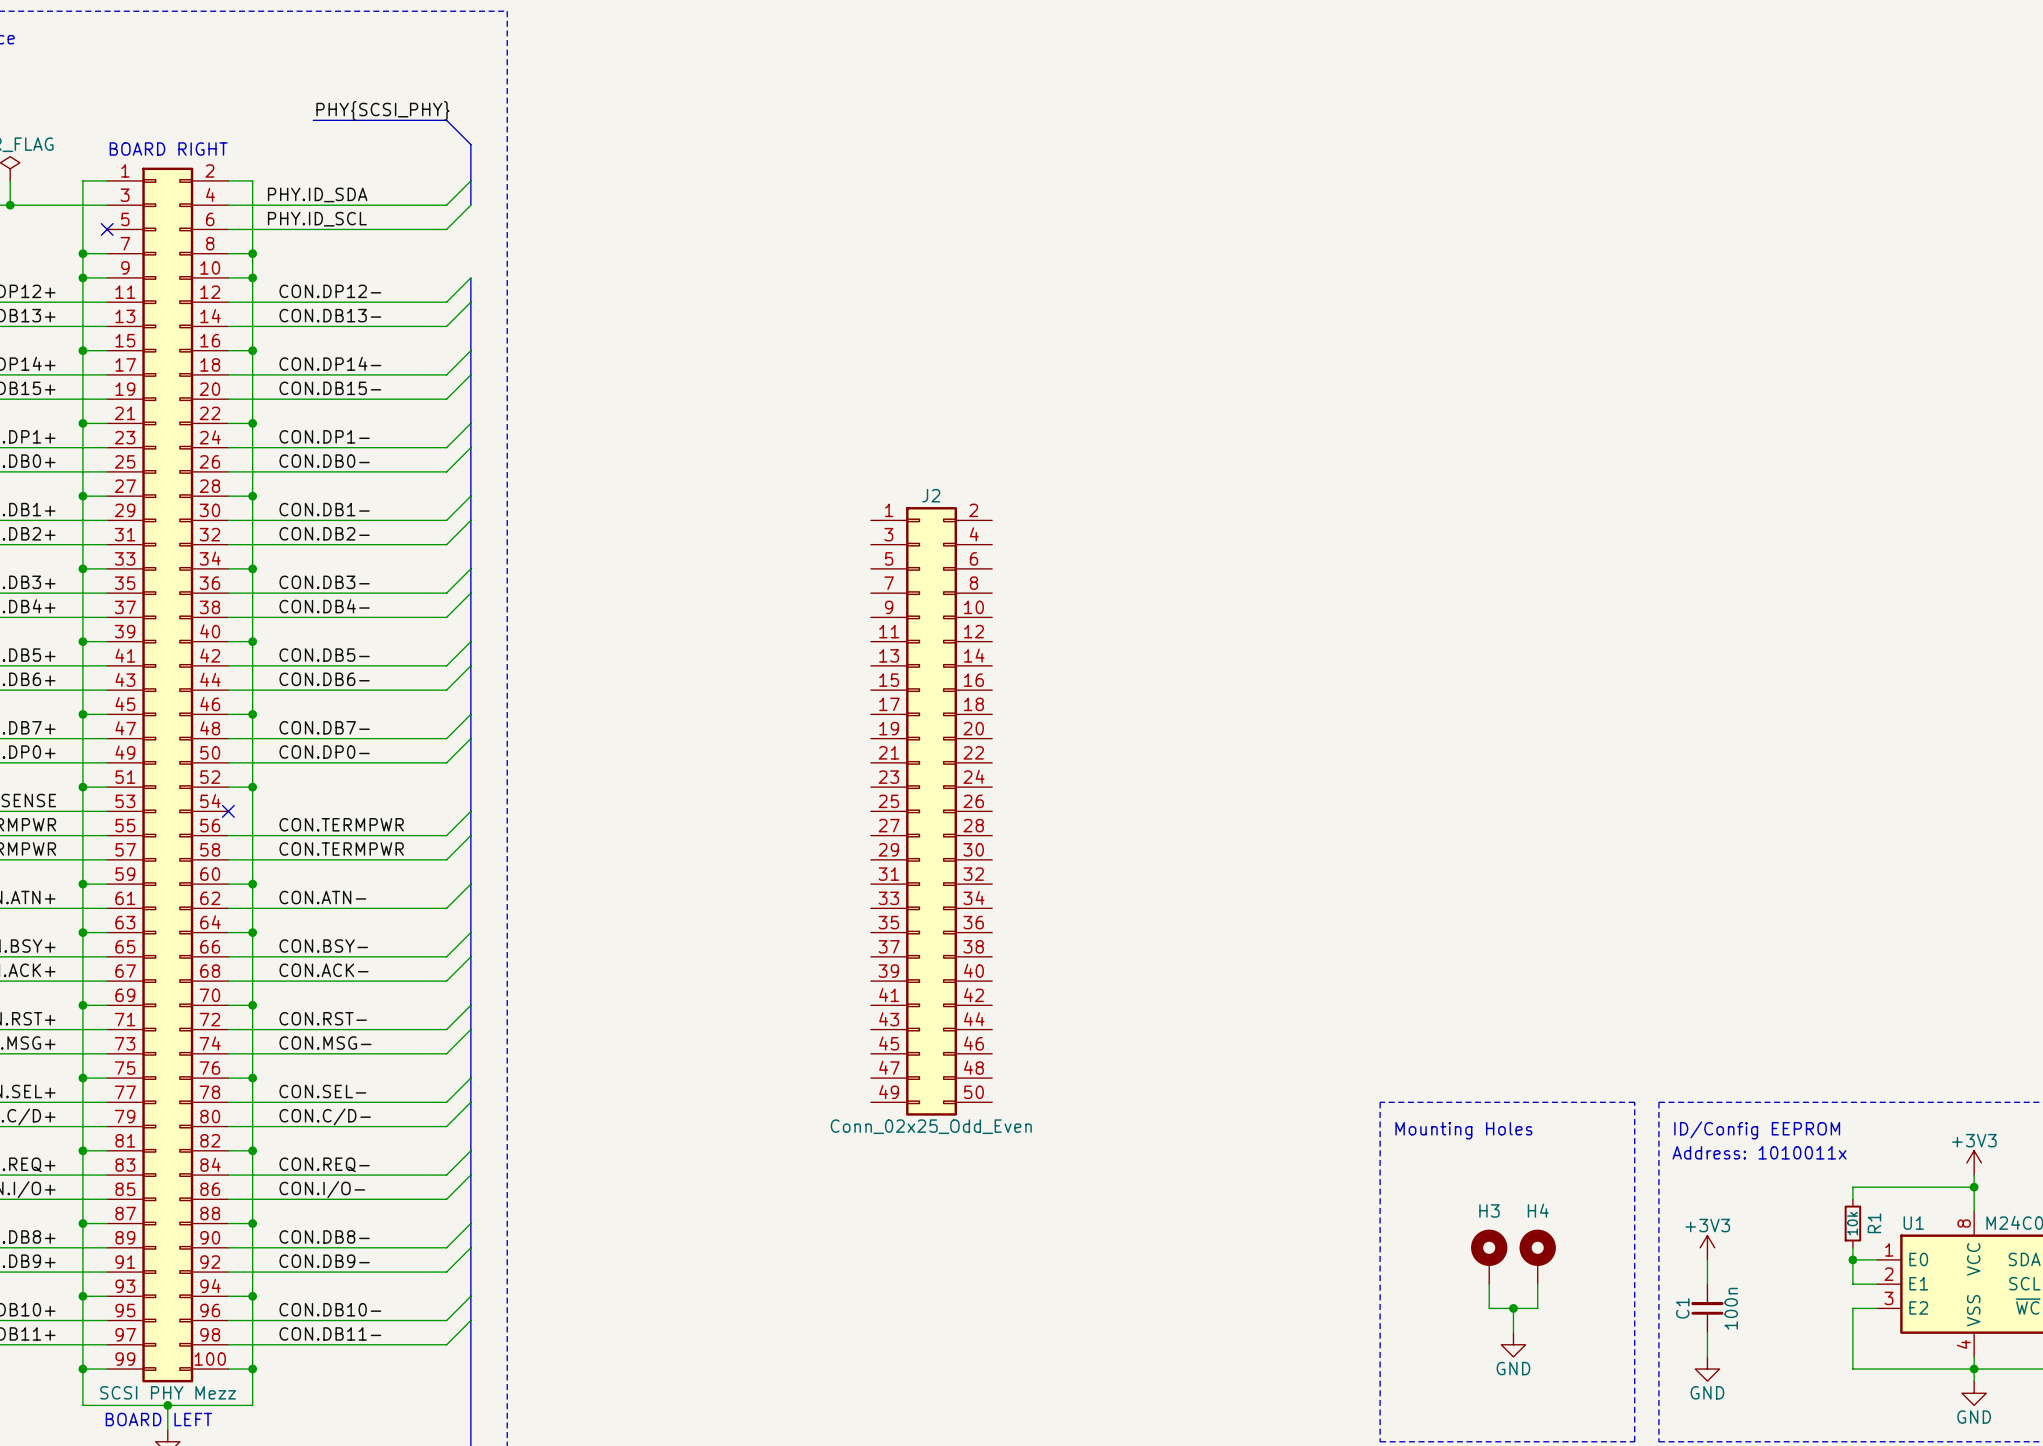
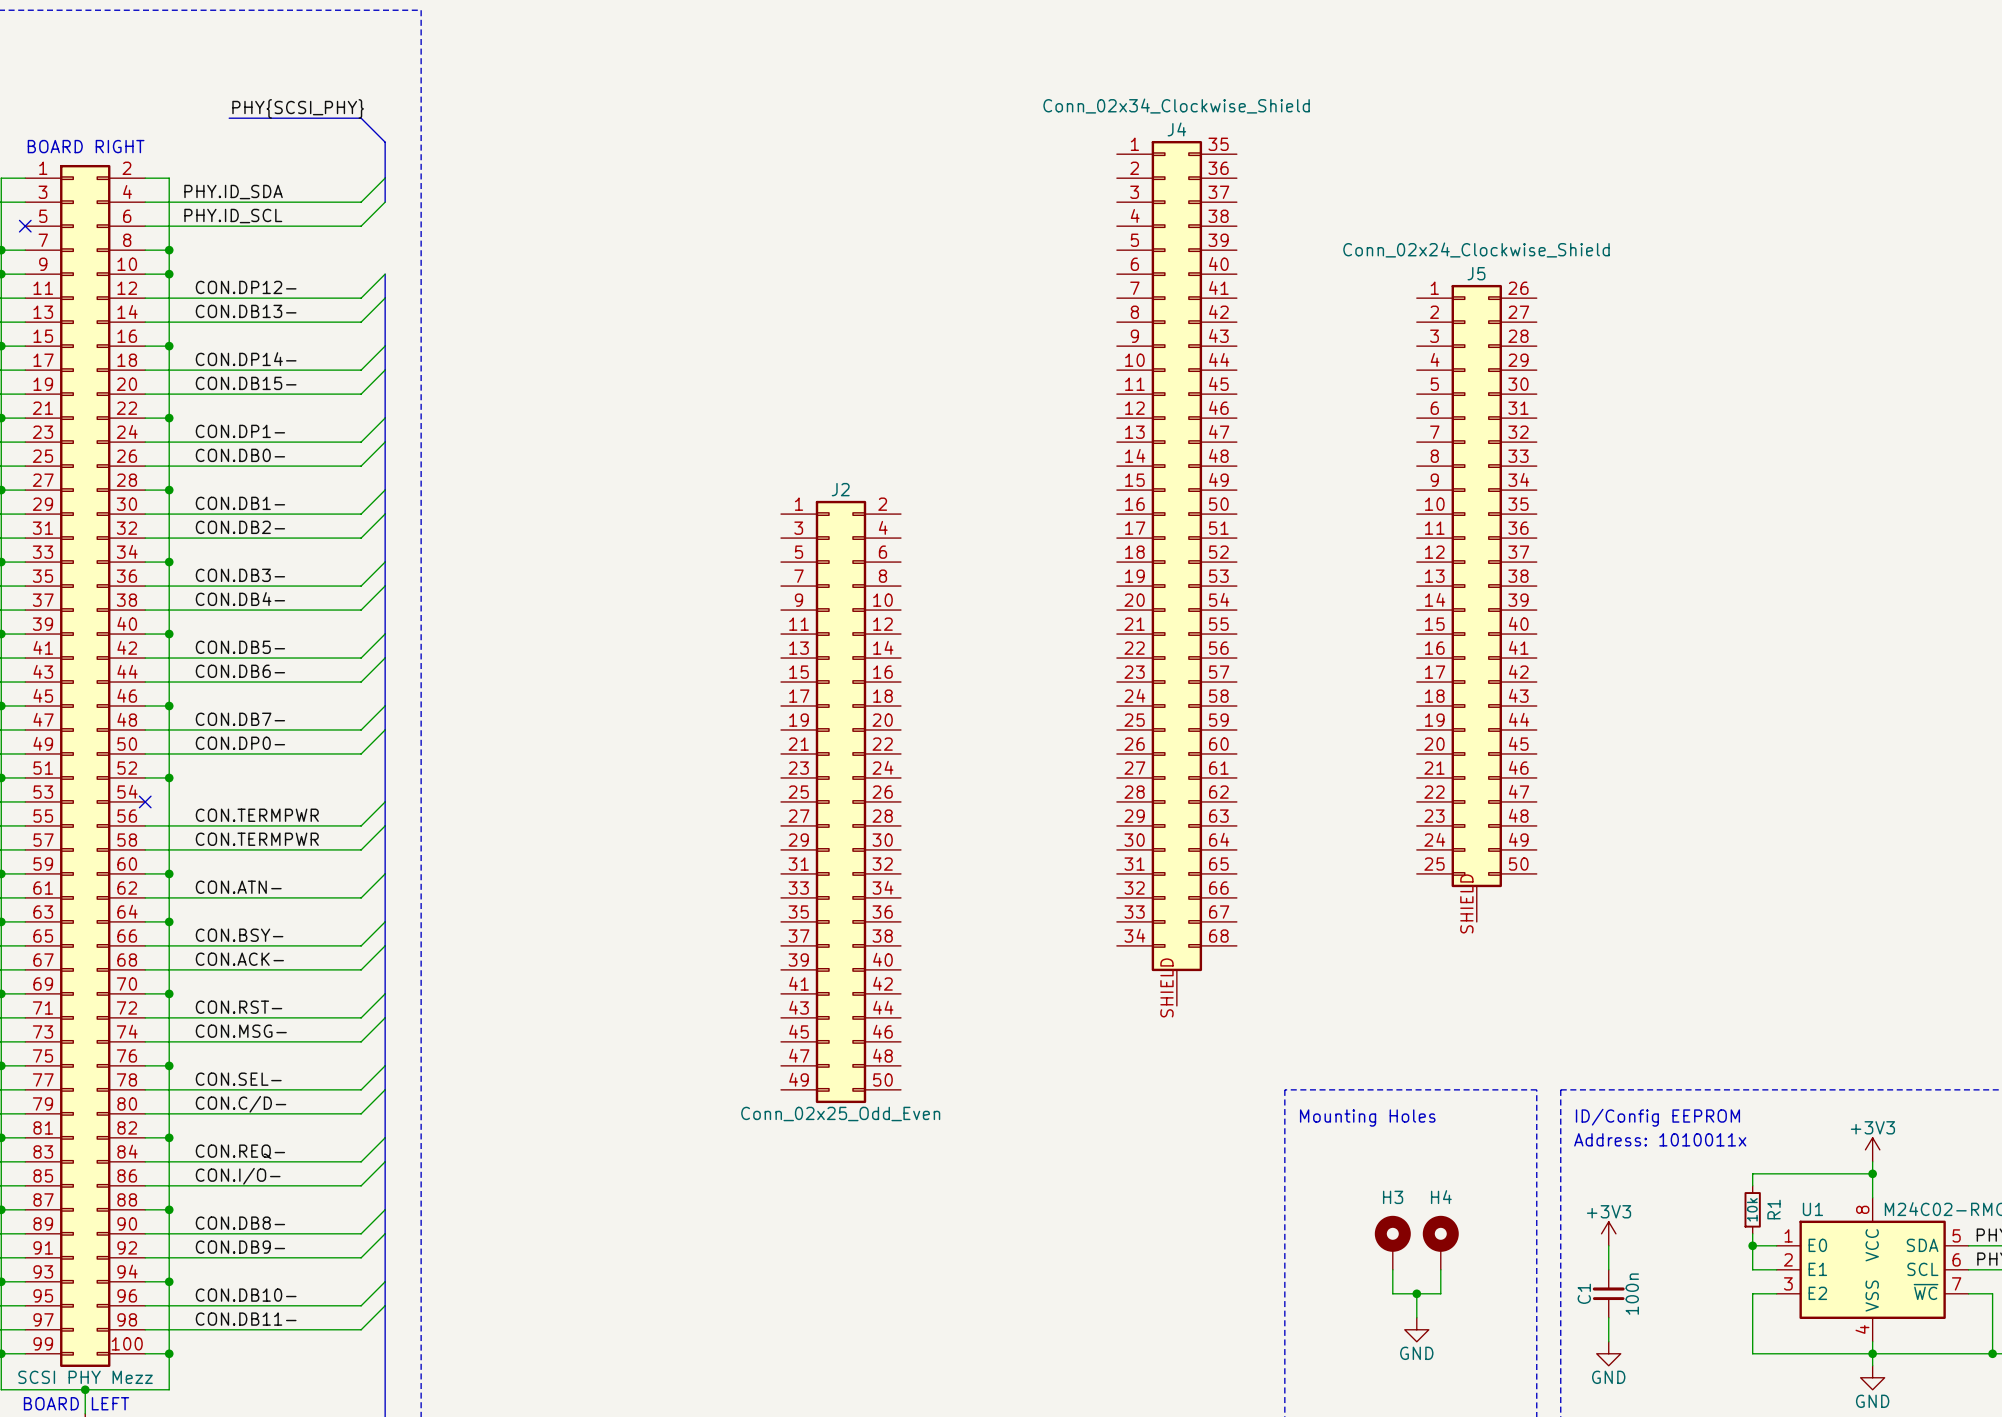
J4: none -> Conn_02x34_Clockwise_Shield (1176, 573)
J5: none -> Conn_02x24_Clockwise_Shield (1476, 603)

